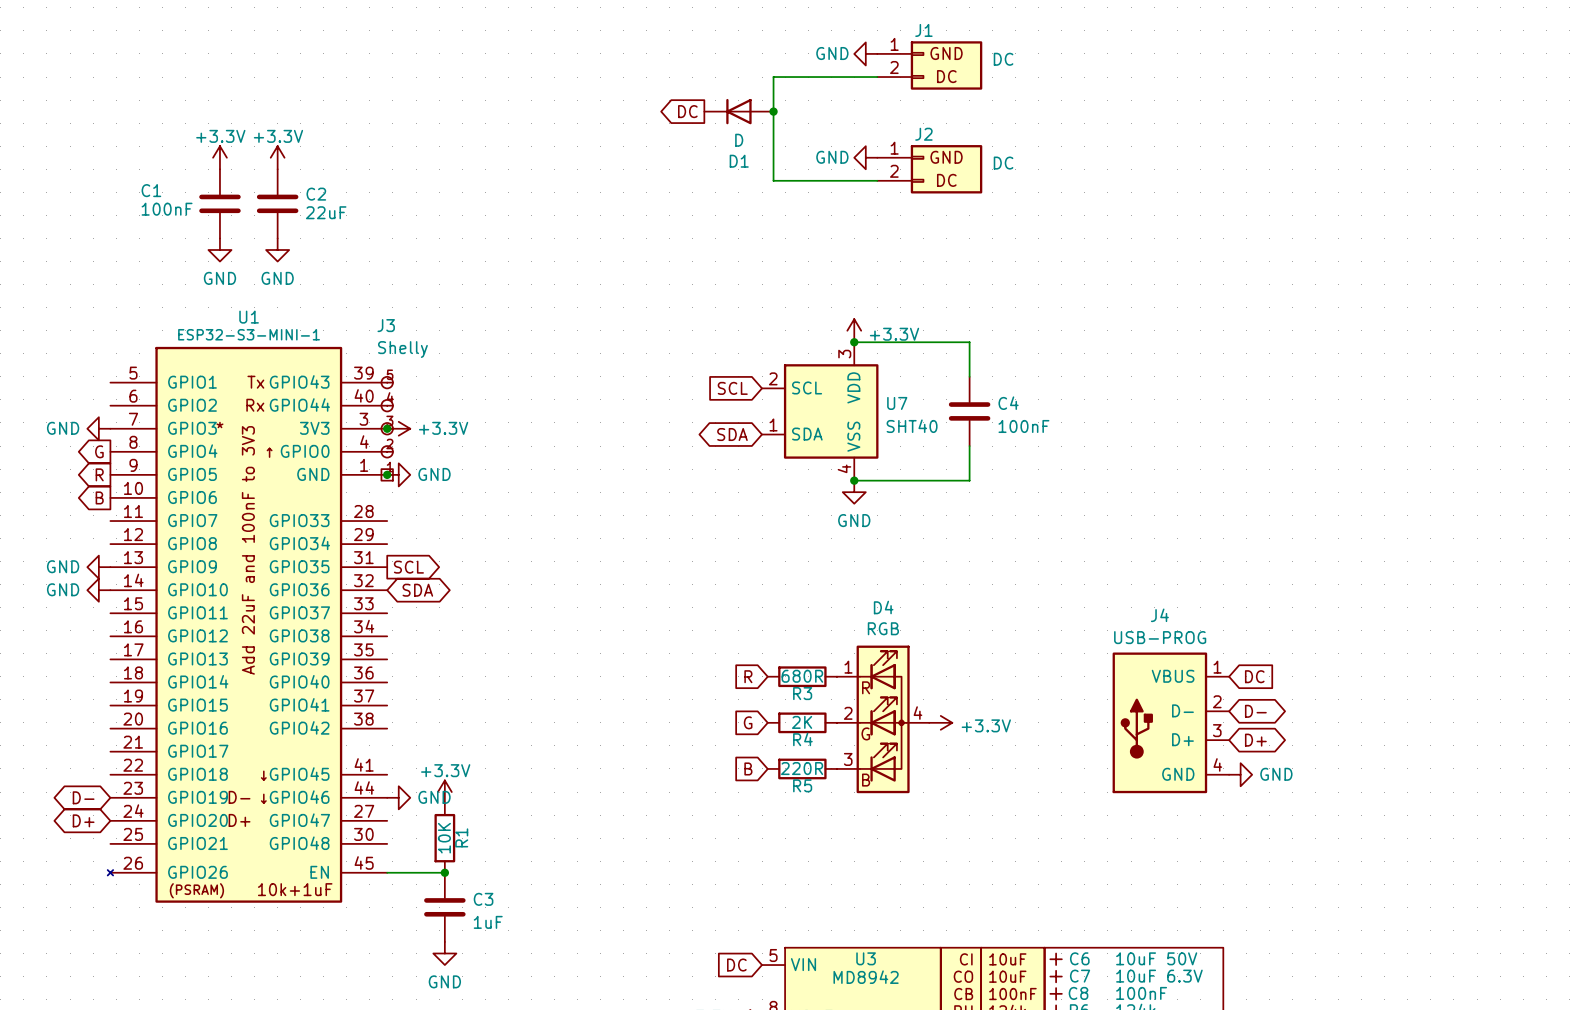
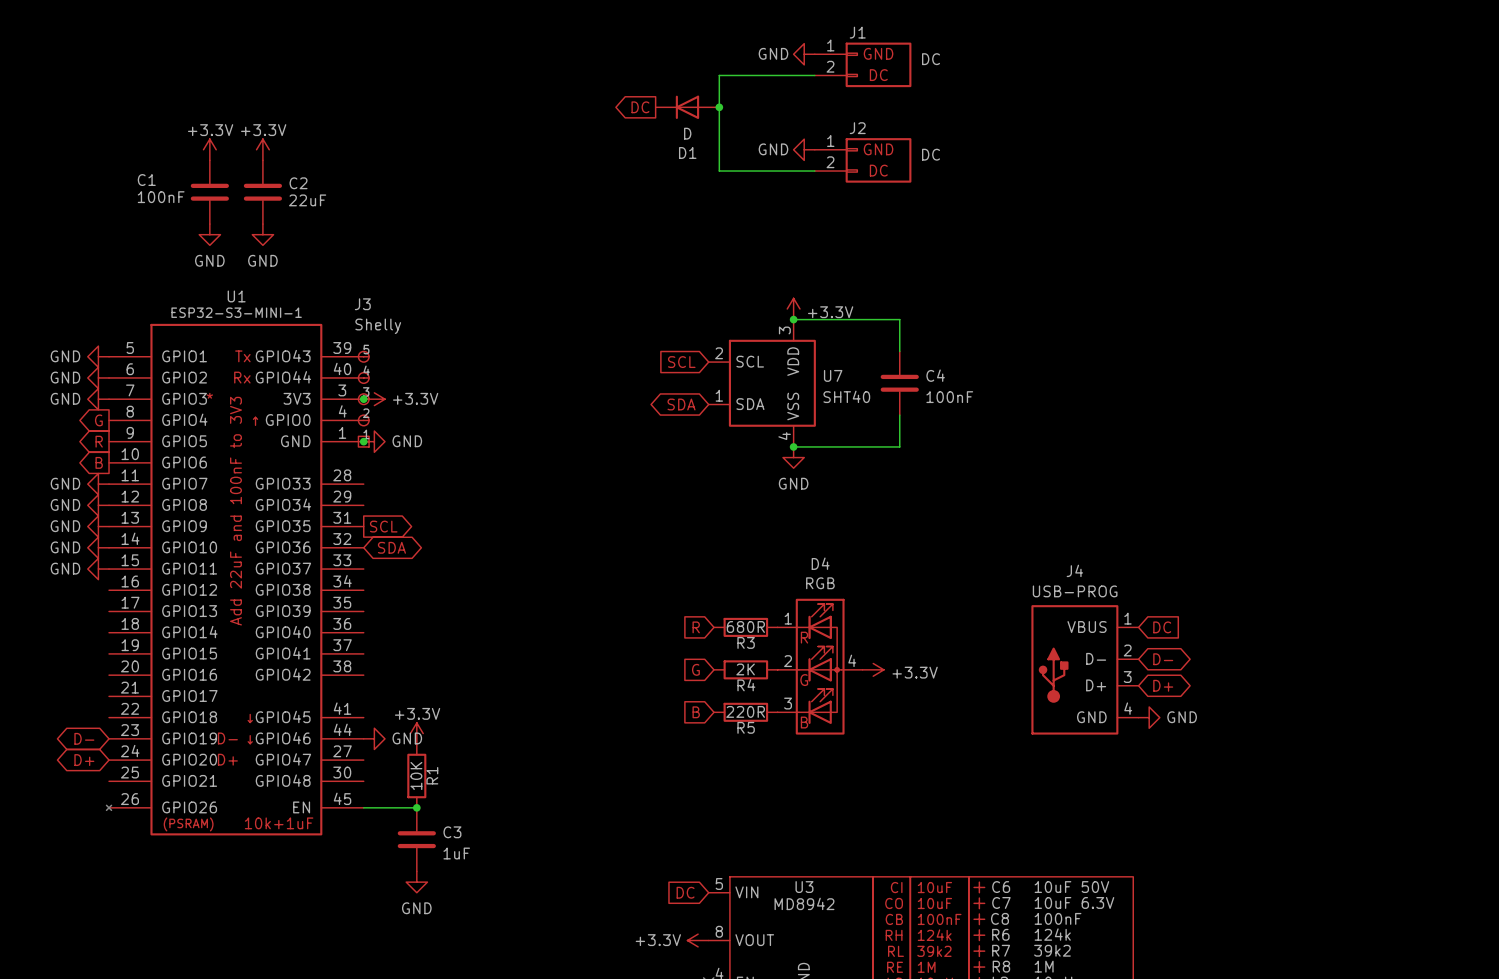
power symbol: none -> GND (98, 356)
power symbol: none -> GND (98, 377)
power symbol: none -> GND (98, 484)
power symbol: none -> GND (98, 505)
power symbol: none -> GND (98, 569)

